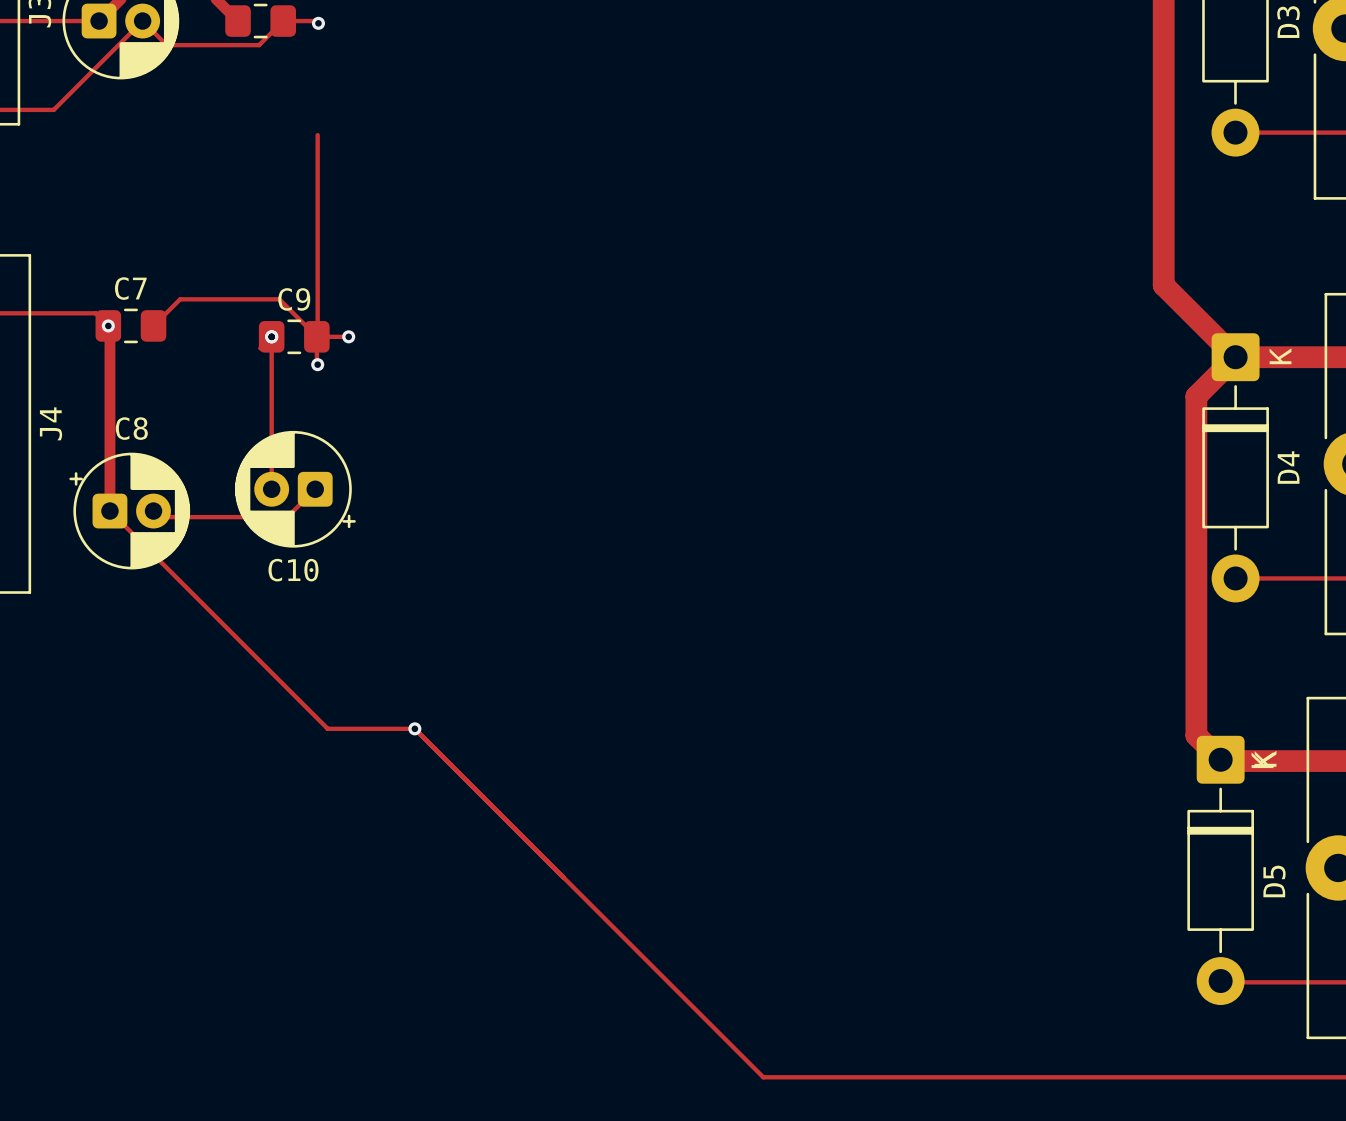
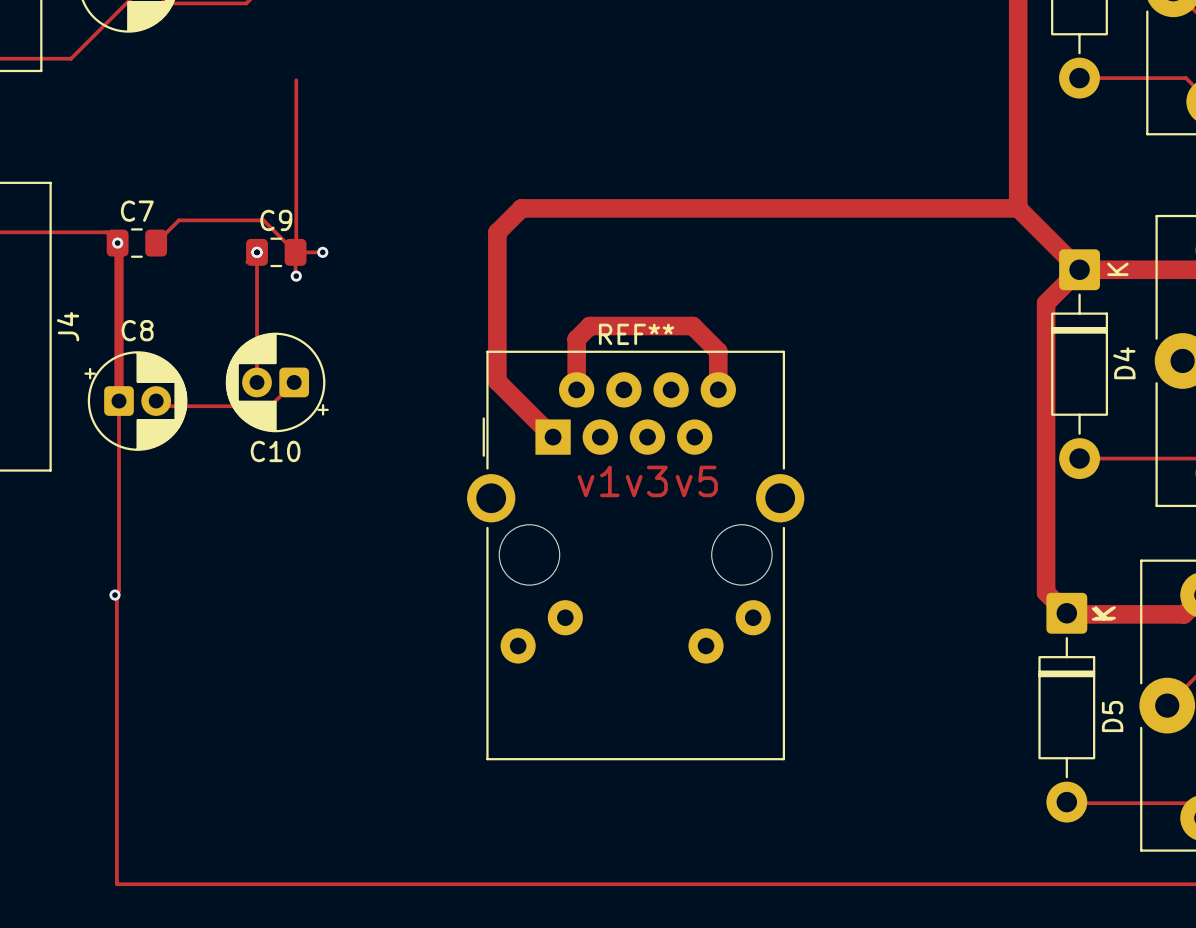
track: none -> (1018, 208) (521, 208) (497, 232) (497, 381) (553, 437)
track: none -> (576, 389) (576, 339) (589, 326) (692, 326) (718, 351) (718, 389)
track: (109, 511) (327, 728) (414, 728) (763, 1077) -> (119, 401) (119, 591) (115, 595) (116, 596) (117, 884) (676, 884)
text: none -> v1 (598, 481)
text: none -> v3 (646, 481)
text: none -> v5 (696, 481)
REF**: none -> (635, 555)
via: (414, 728) -> none
via: none -> (115, 595)

